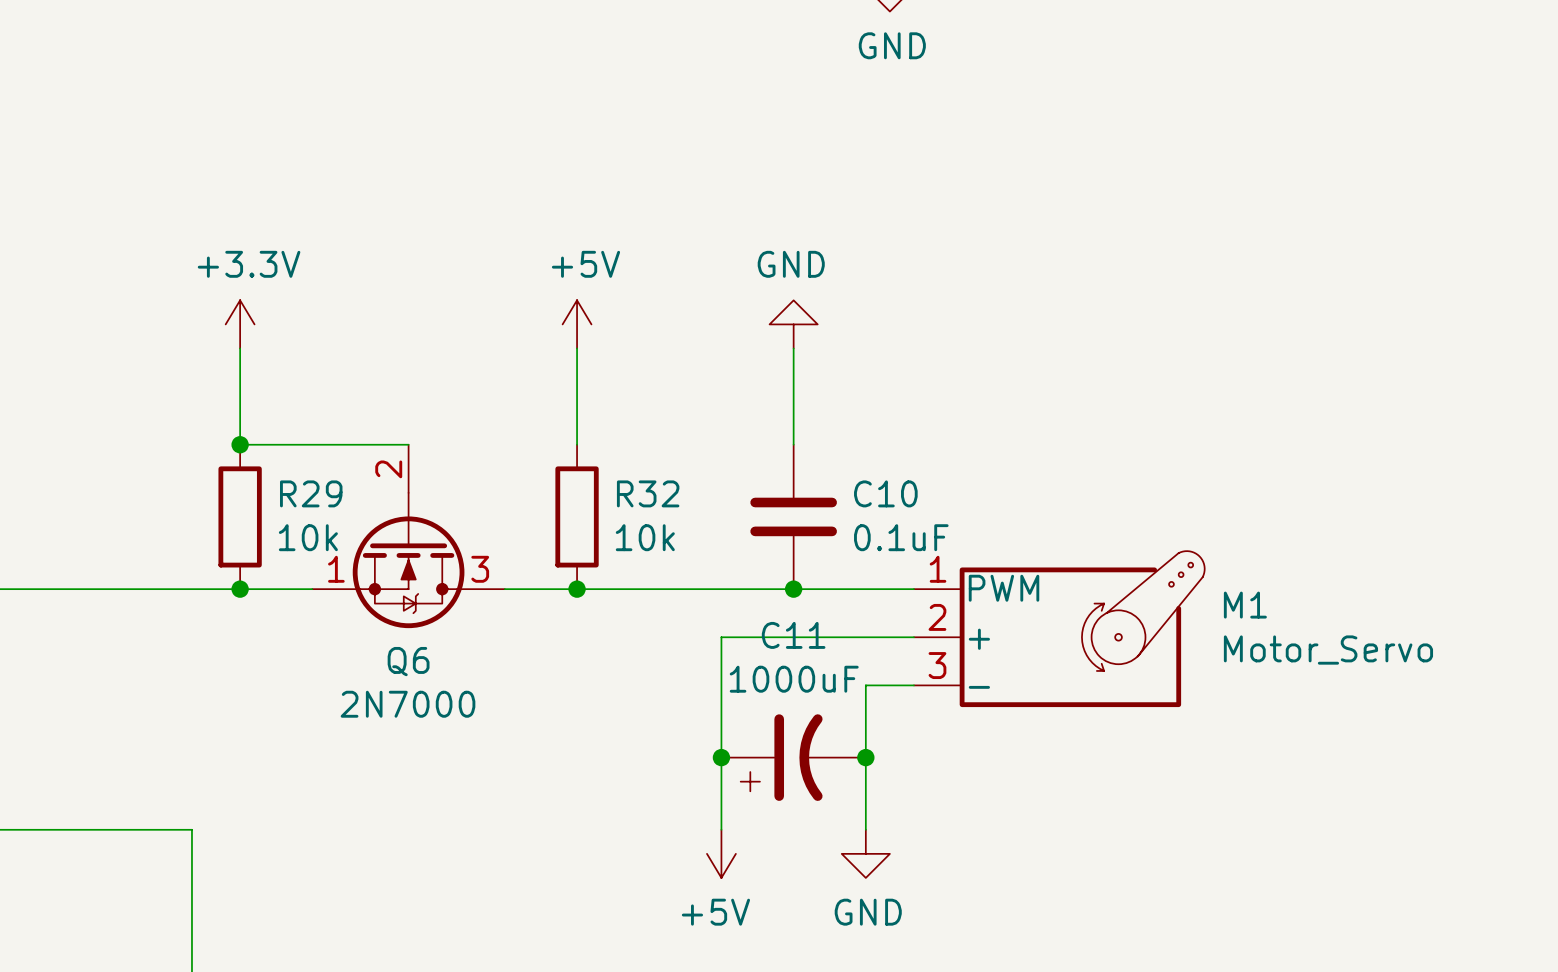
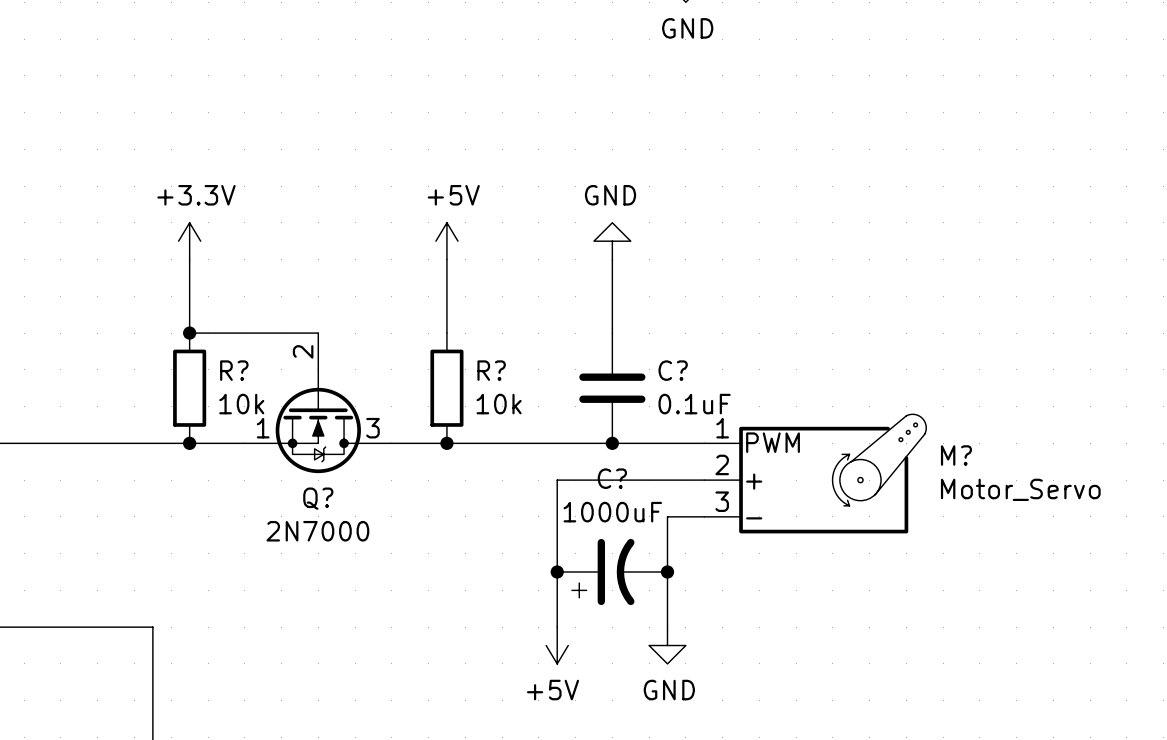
R29 name: R29 (311, 493) -> R? (234, 370)
R32 name: R32 (648, 493) -> R? (491, 370)
C10 name: C10 (885, 493) -> C? (673, 370)
M1 name: M1 (1245, 605) -> M? (956, 455)
C11 name: C11 (793, 635) -> C? (612, 478)
Q6 name: Q6 (408, 661) -> Q? (318, 498)

